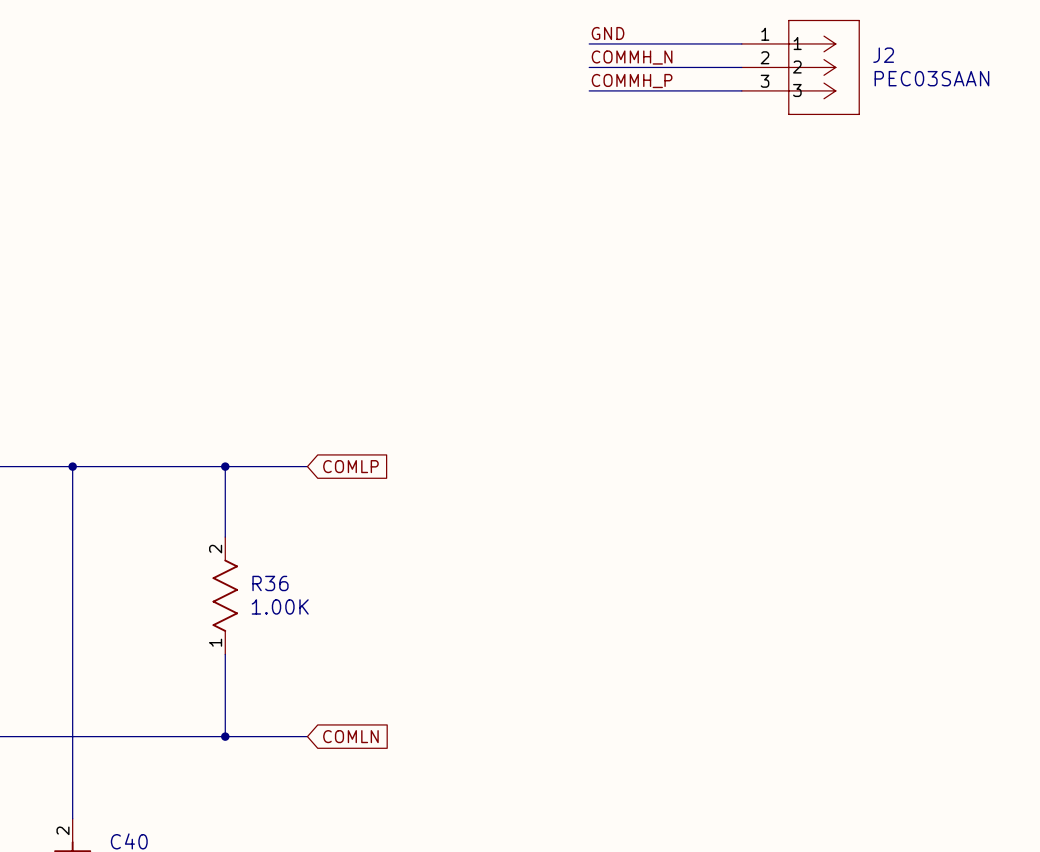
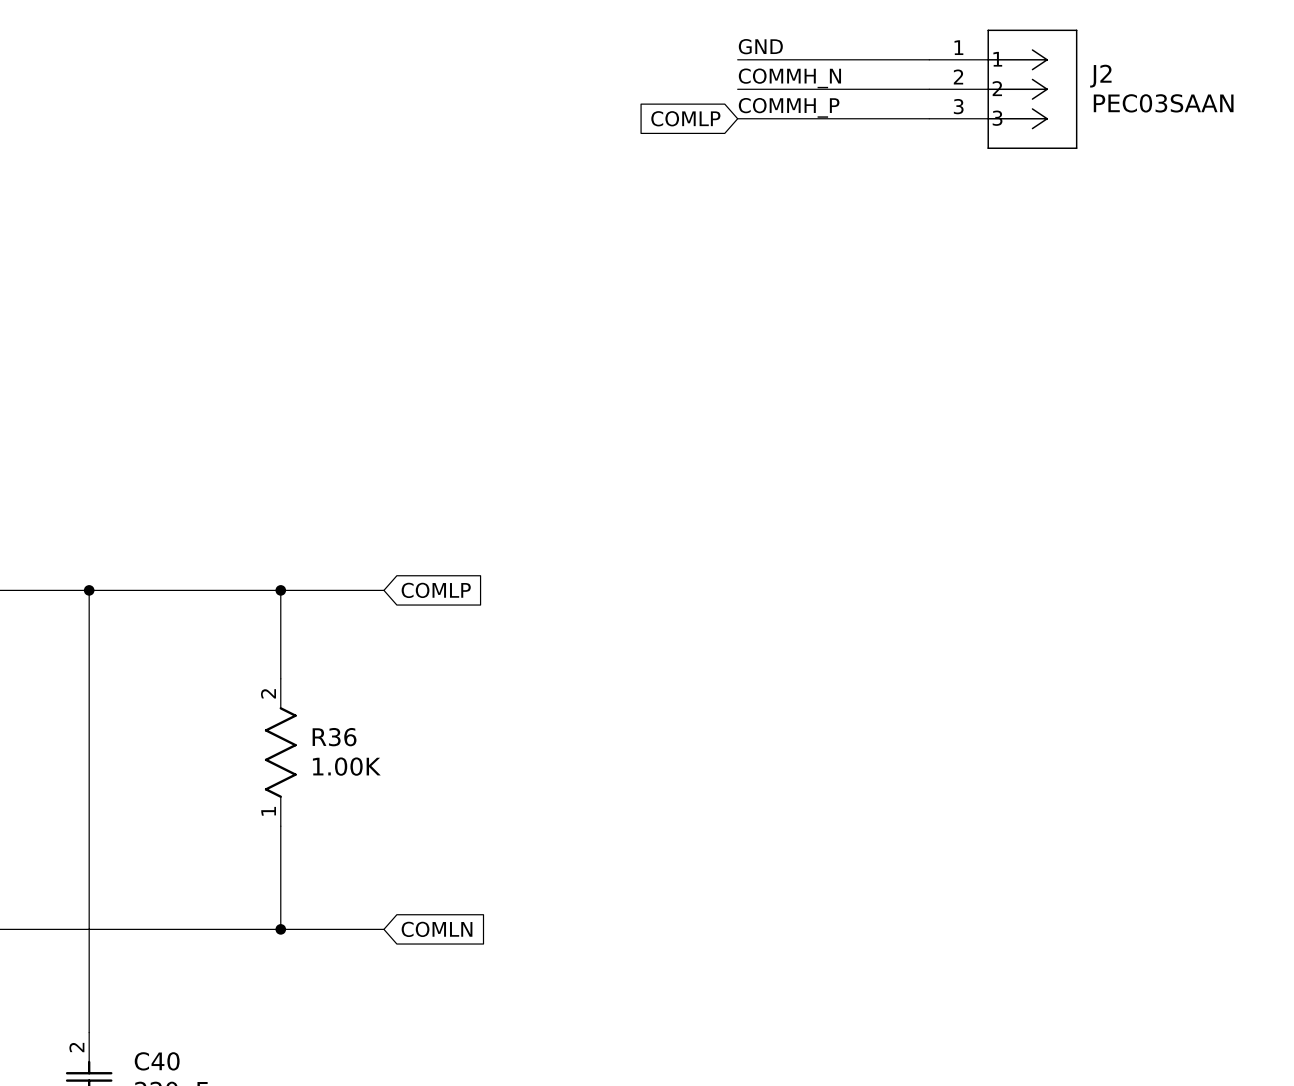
global label: none -> COMLP (685, 118)

